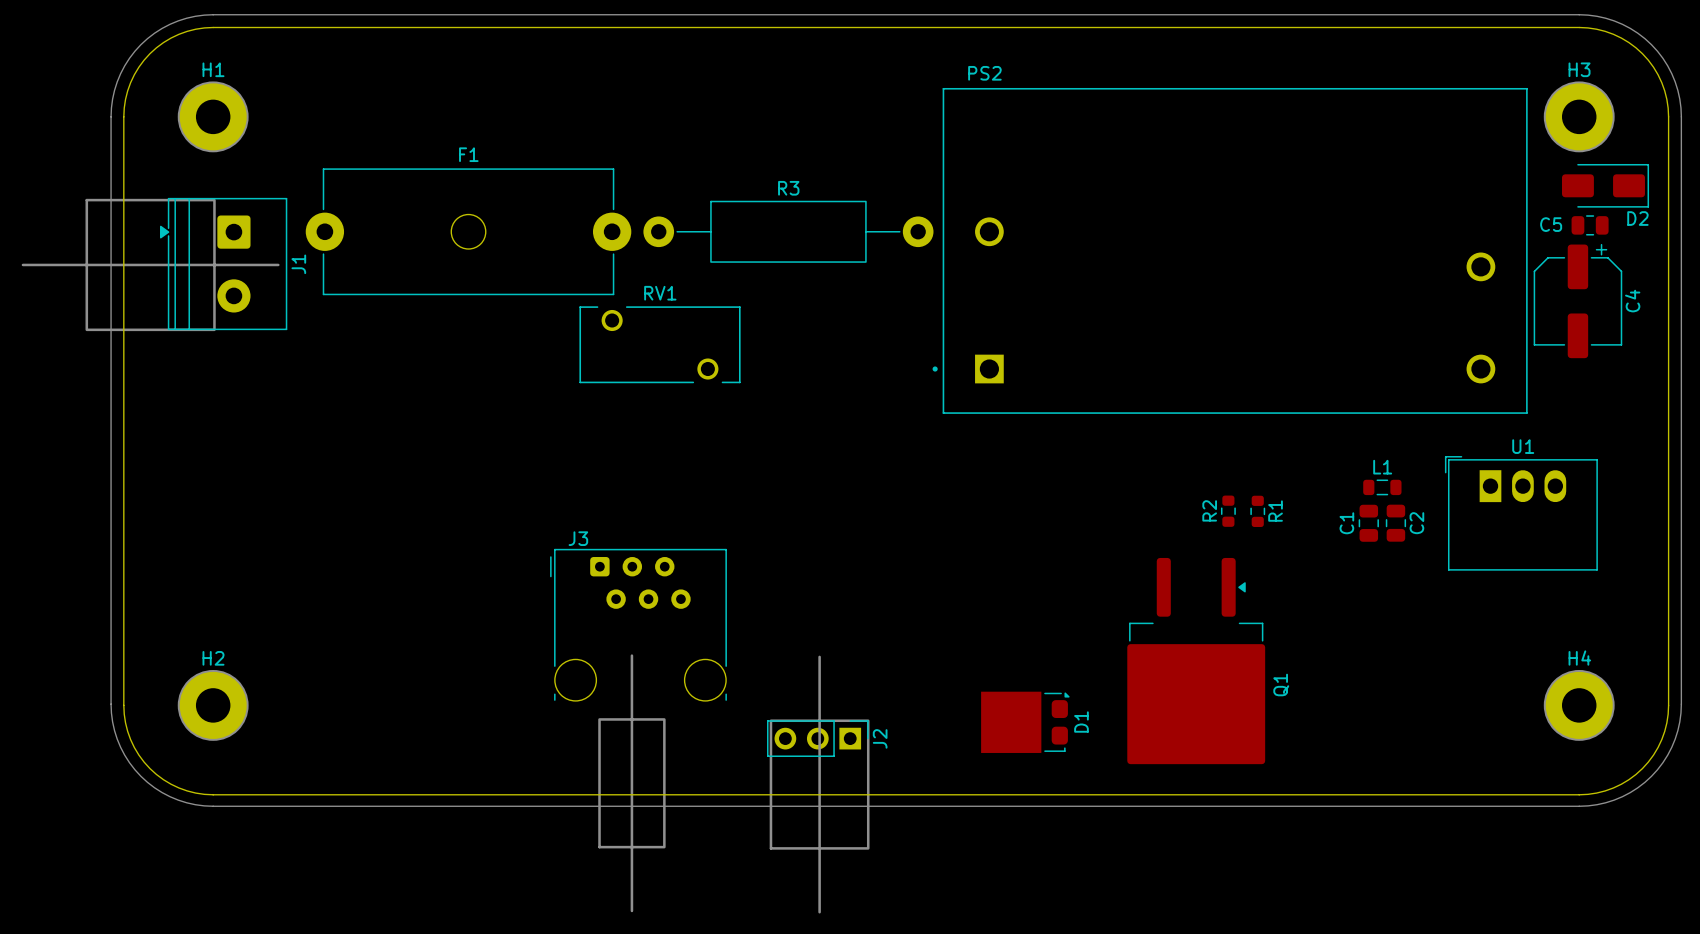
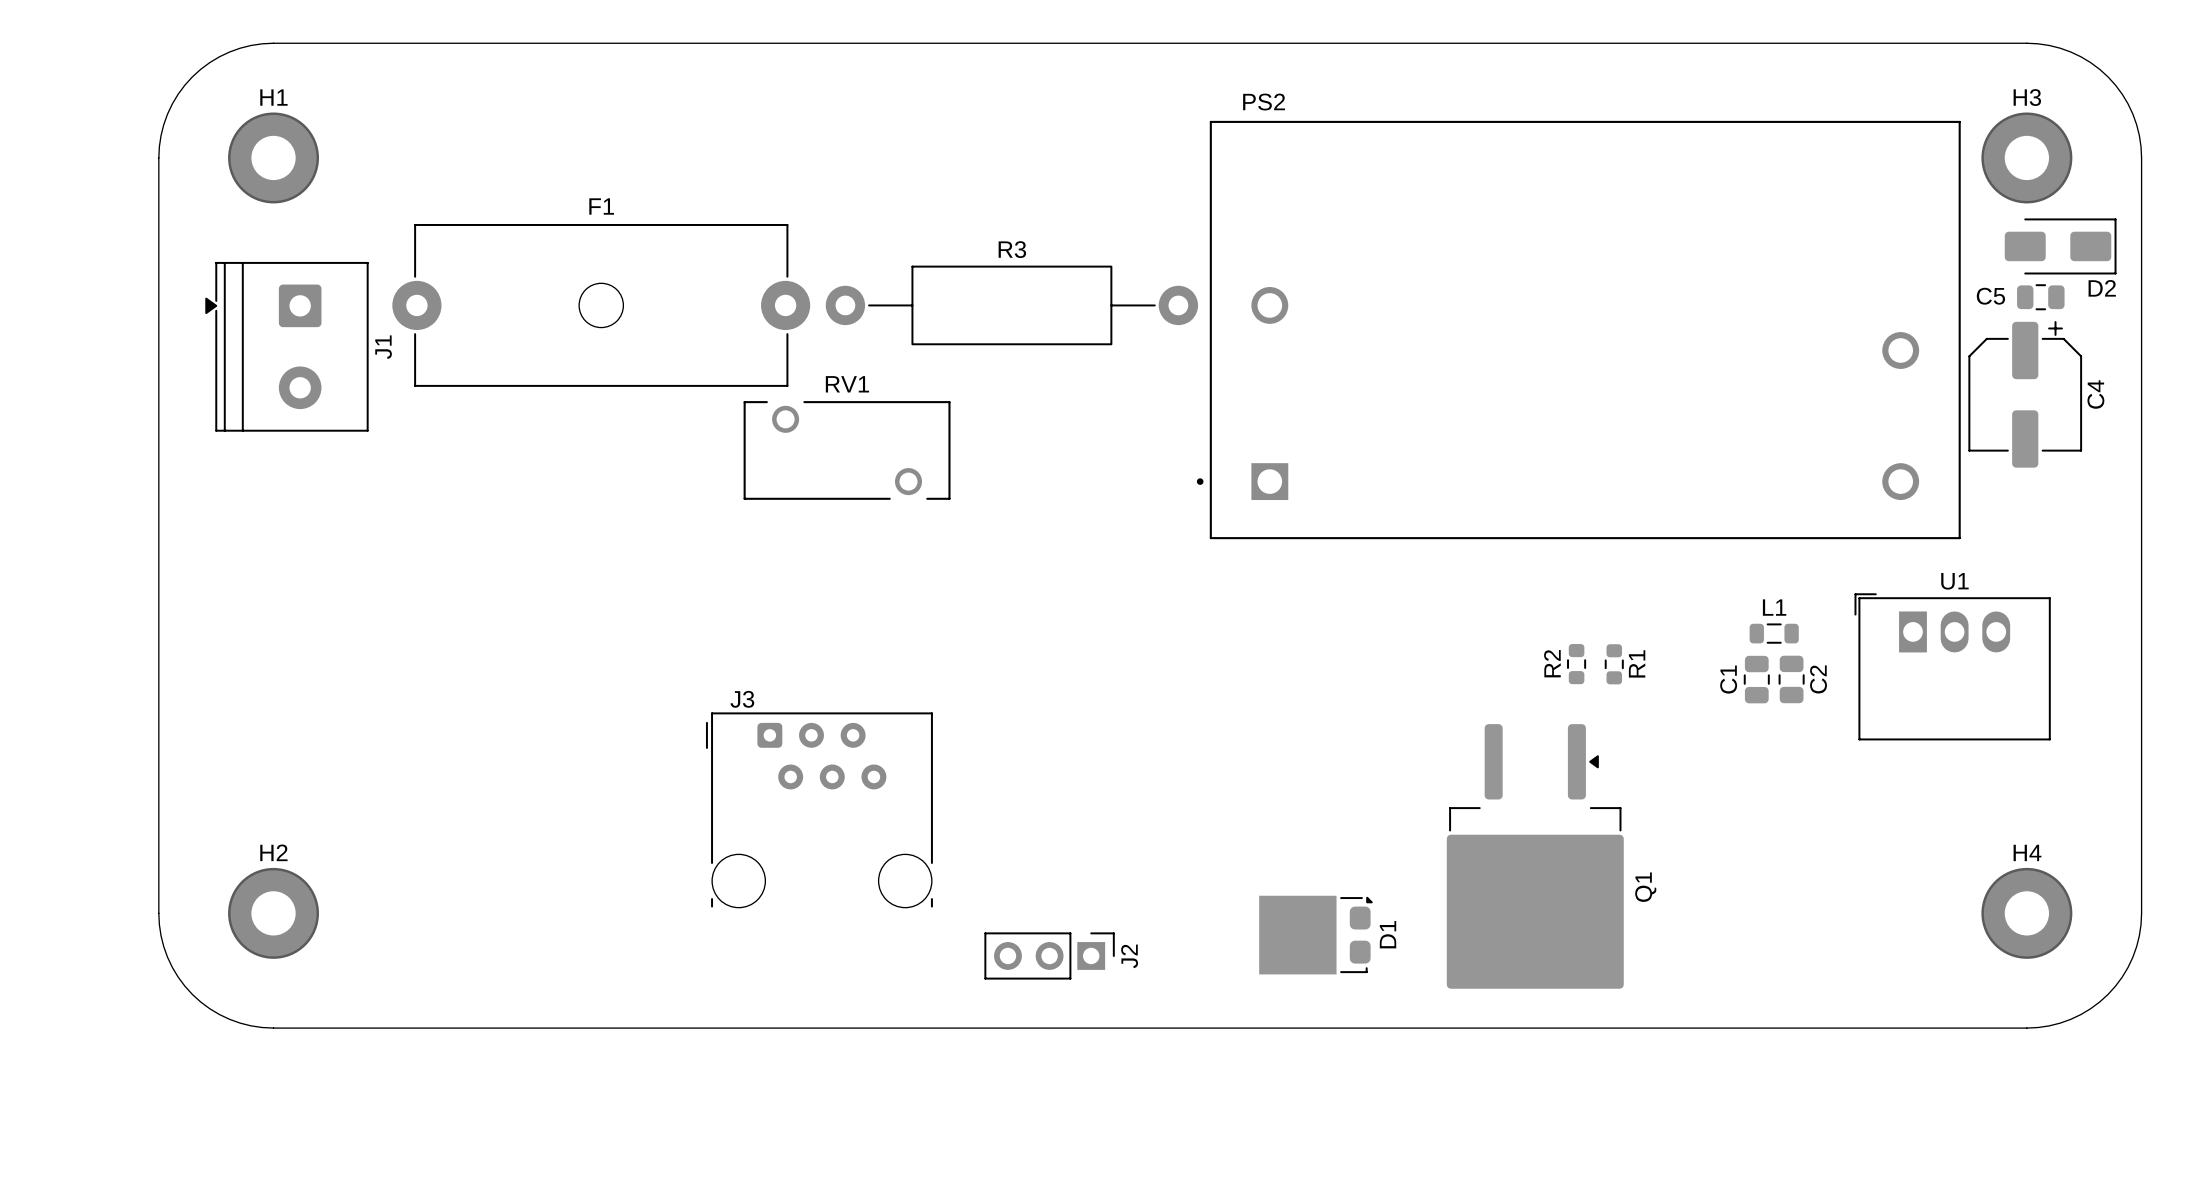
line: (213, 14) (1579, 14) (1596, 16) (1622, 24) (1644, 38) (1662, 58) (1675, 81) (1680, 107) (1681, 704) (1679, 721) (1671, 747) (1657, 769) (1637, 787) (1614, 800) (1596, 804) (1579, 806) (213, 806) (195, 804) (170, 796) (147, 782) (129, 762) (117, 739) (111, 713) (111, 107) (114, 90) (120, 73) (129, 58) (140, 44) (154, 33) (170, 24) (186, 18) (213, 14) -> none
drawing: [21, 198, 280, 332] -> none
drawing: [598, 654, 666, 913] -> none
drawing: [769, 655, 870, 914] -> none

